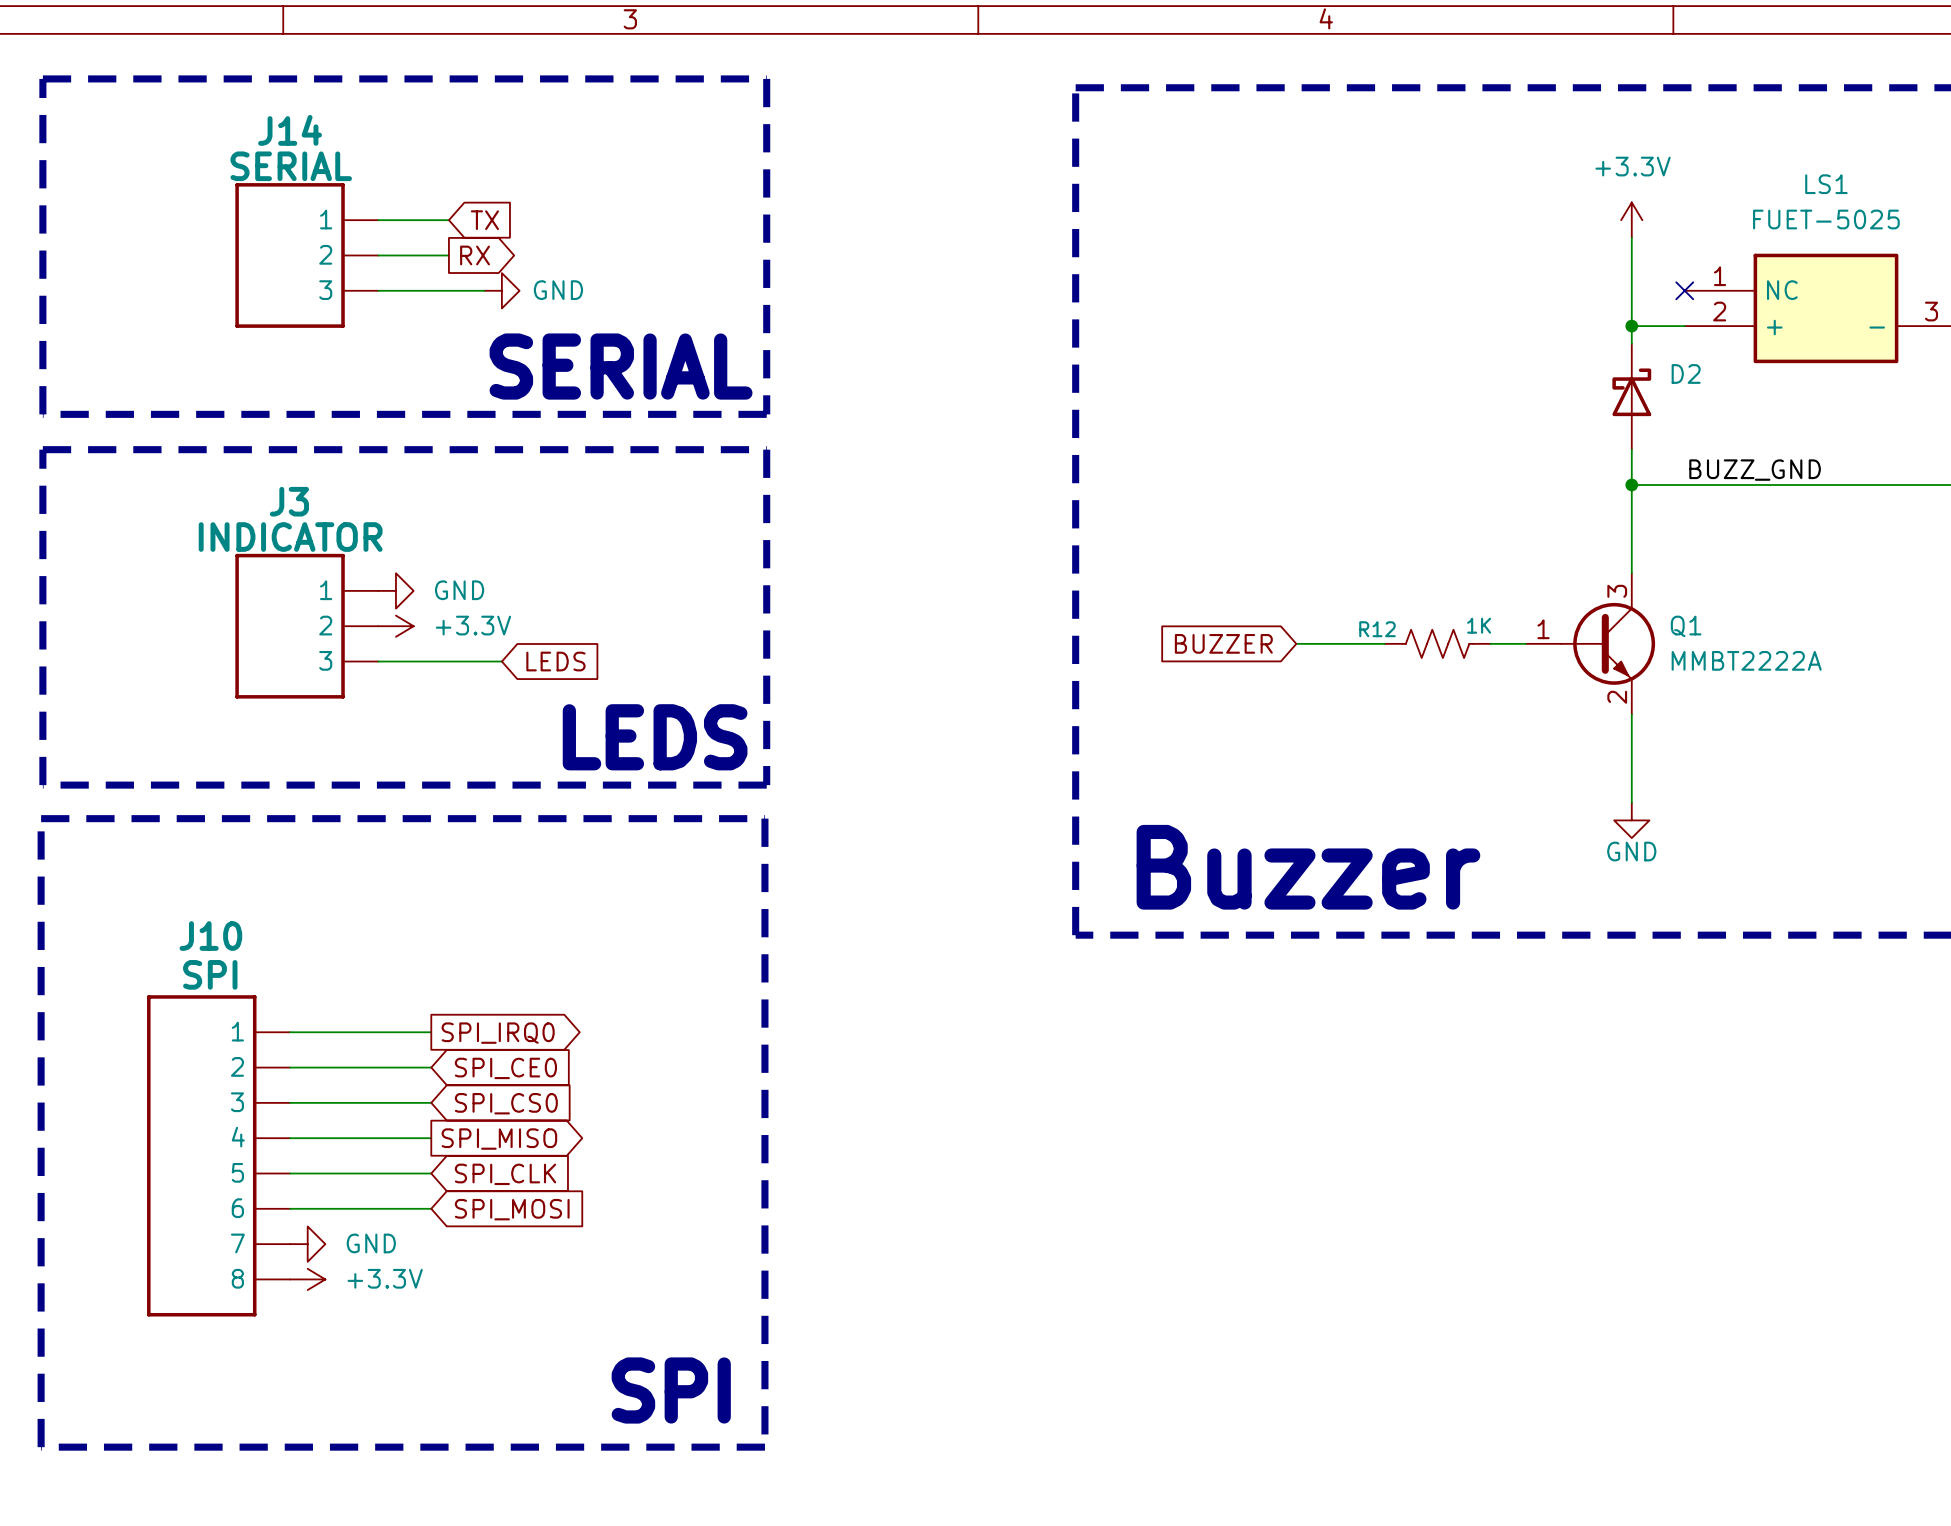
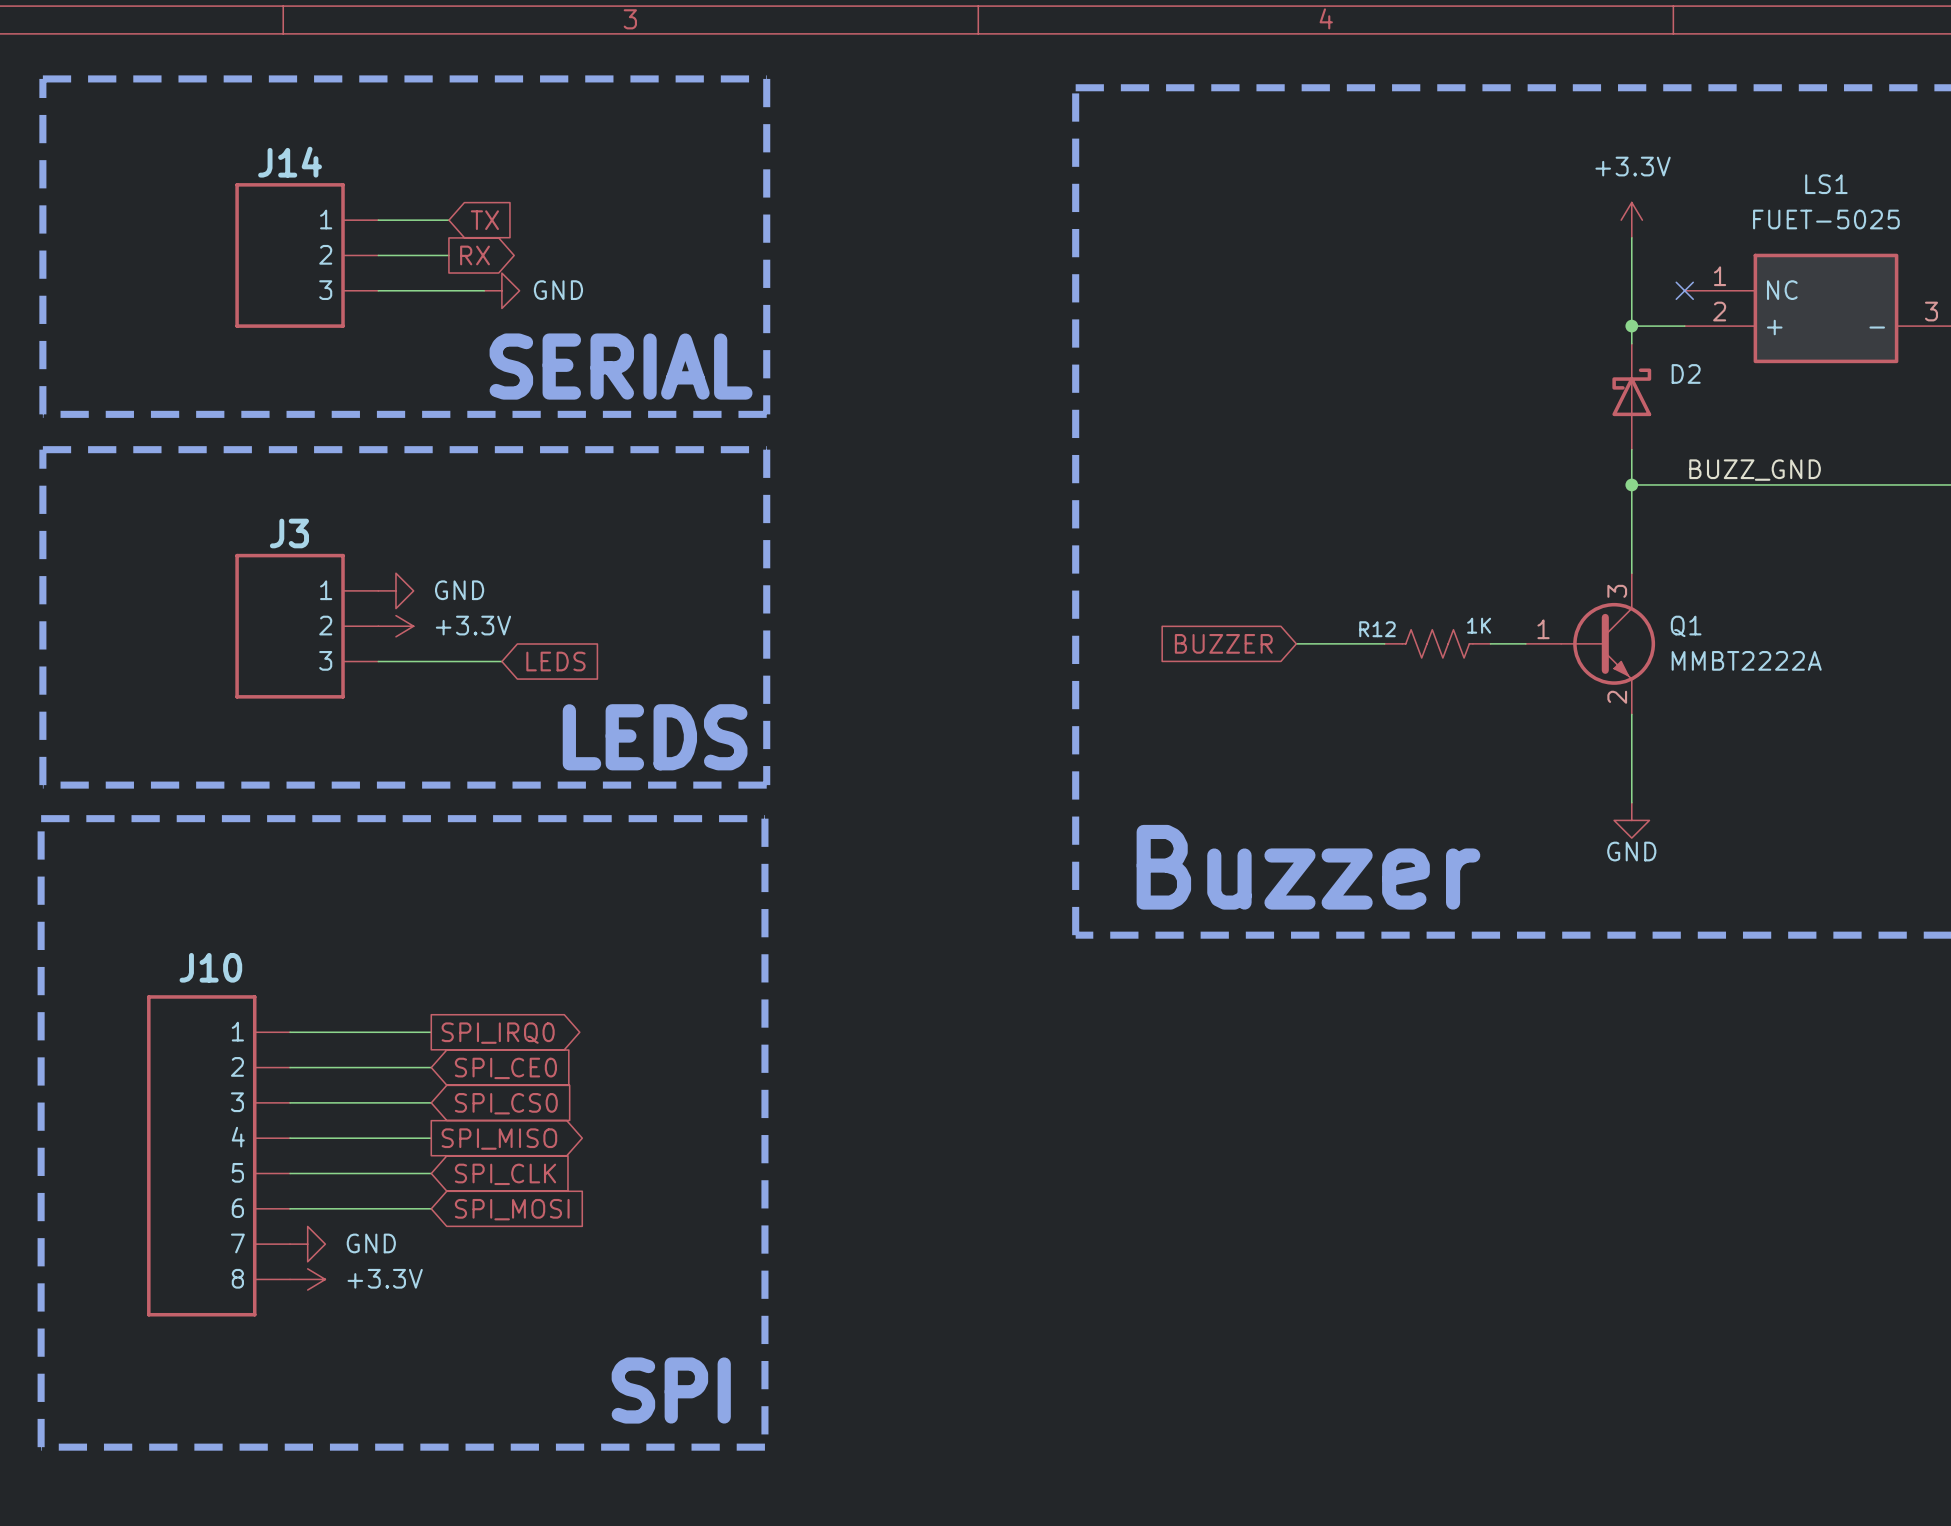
J14 name position: J14 (290, 130) -> J14 (290, 162)
J14 value: SERIAL (291, 166) -> none
J3 name position: J3 (289, 501) -> J3 (289, 533)
J3 value: INDICATOR (290, 537) -> none
J10 name position: J10 (210, 936) -> J10 (210, 967)
J10 value: SPI (210, 974) -> none

